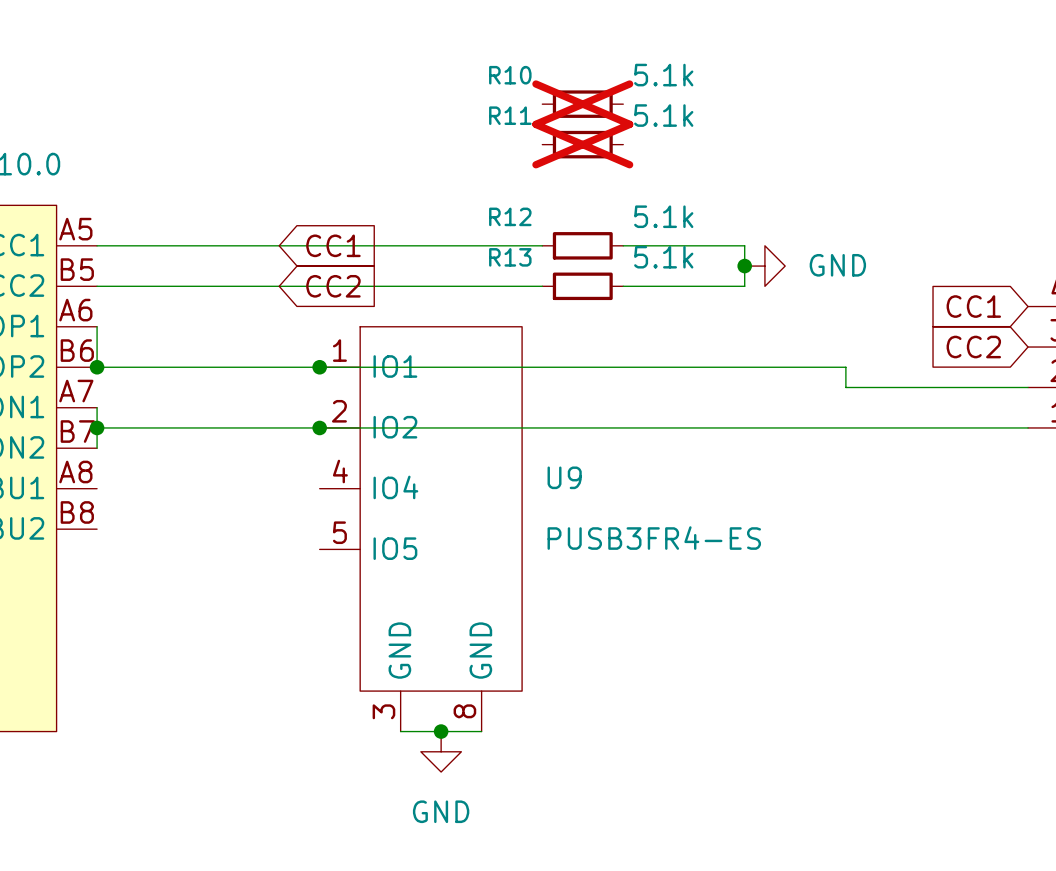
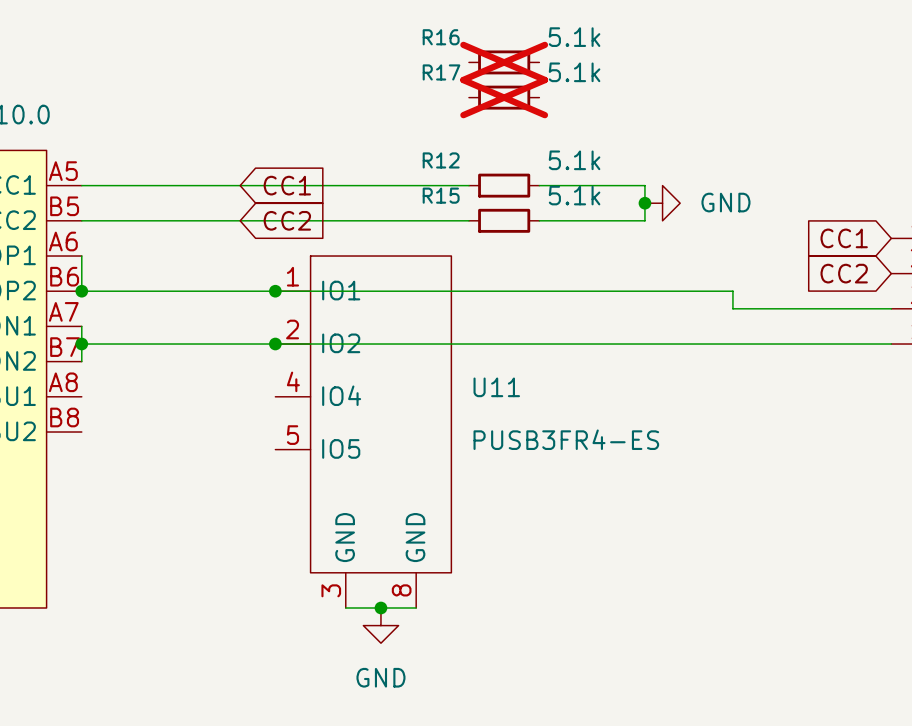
R10 name: R10 (510, 75) -> R16 (441, 37)
R11 name: R11 (510, 115) -> R17 (441, 72)
R13 name: R13 (510, 257) -> R15 (441, 195)
U9 name: U9 (564, 477) -> U11 (496, 387)

